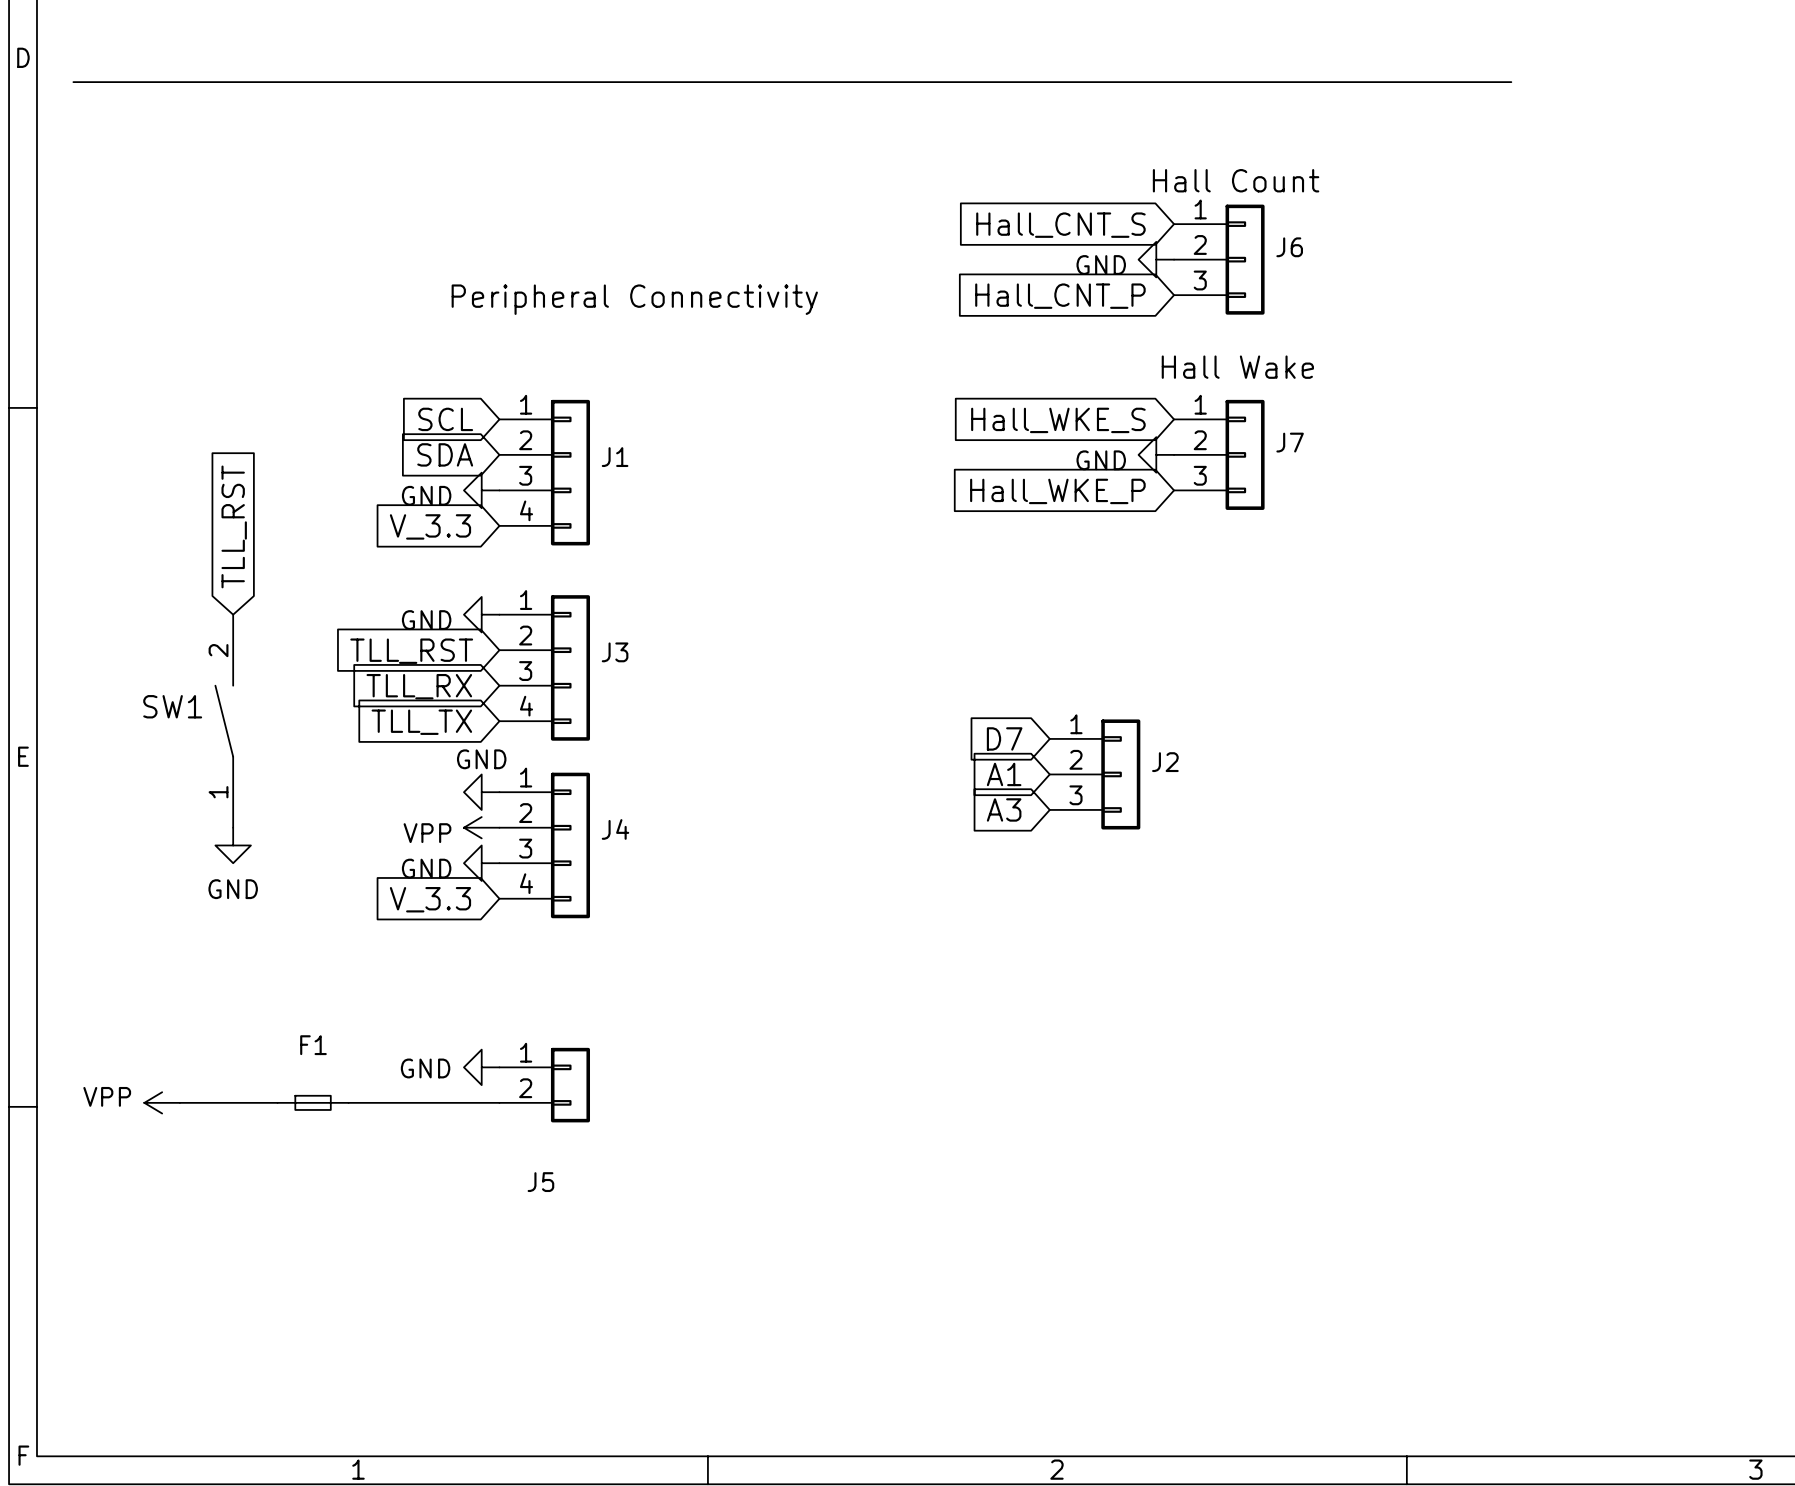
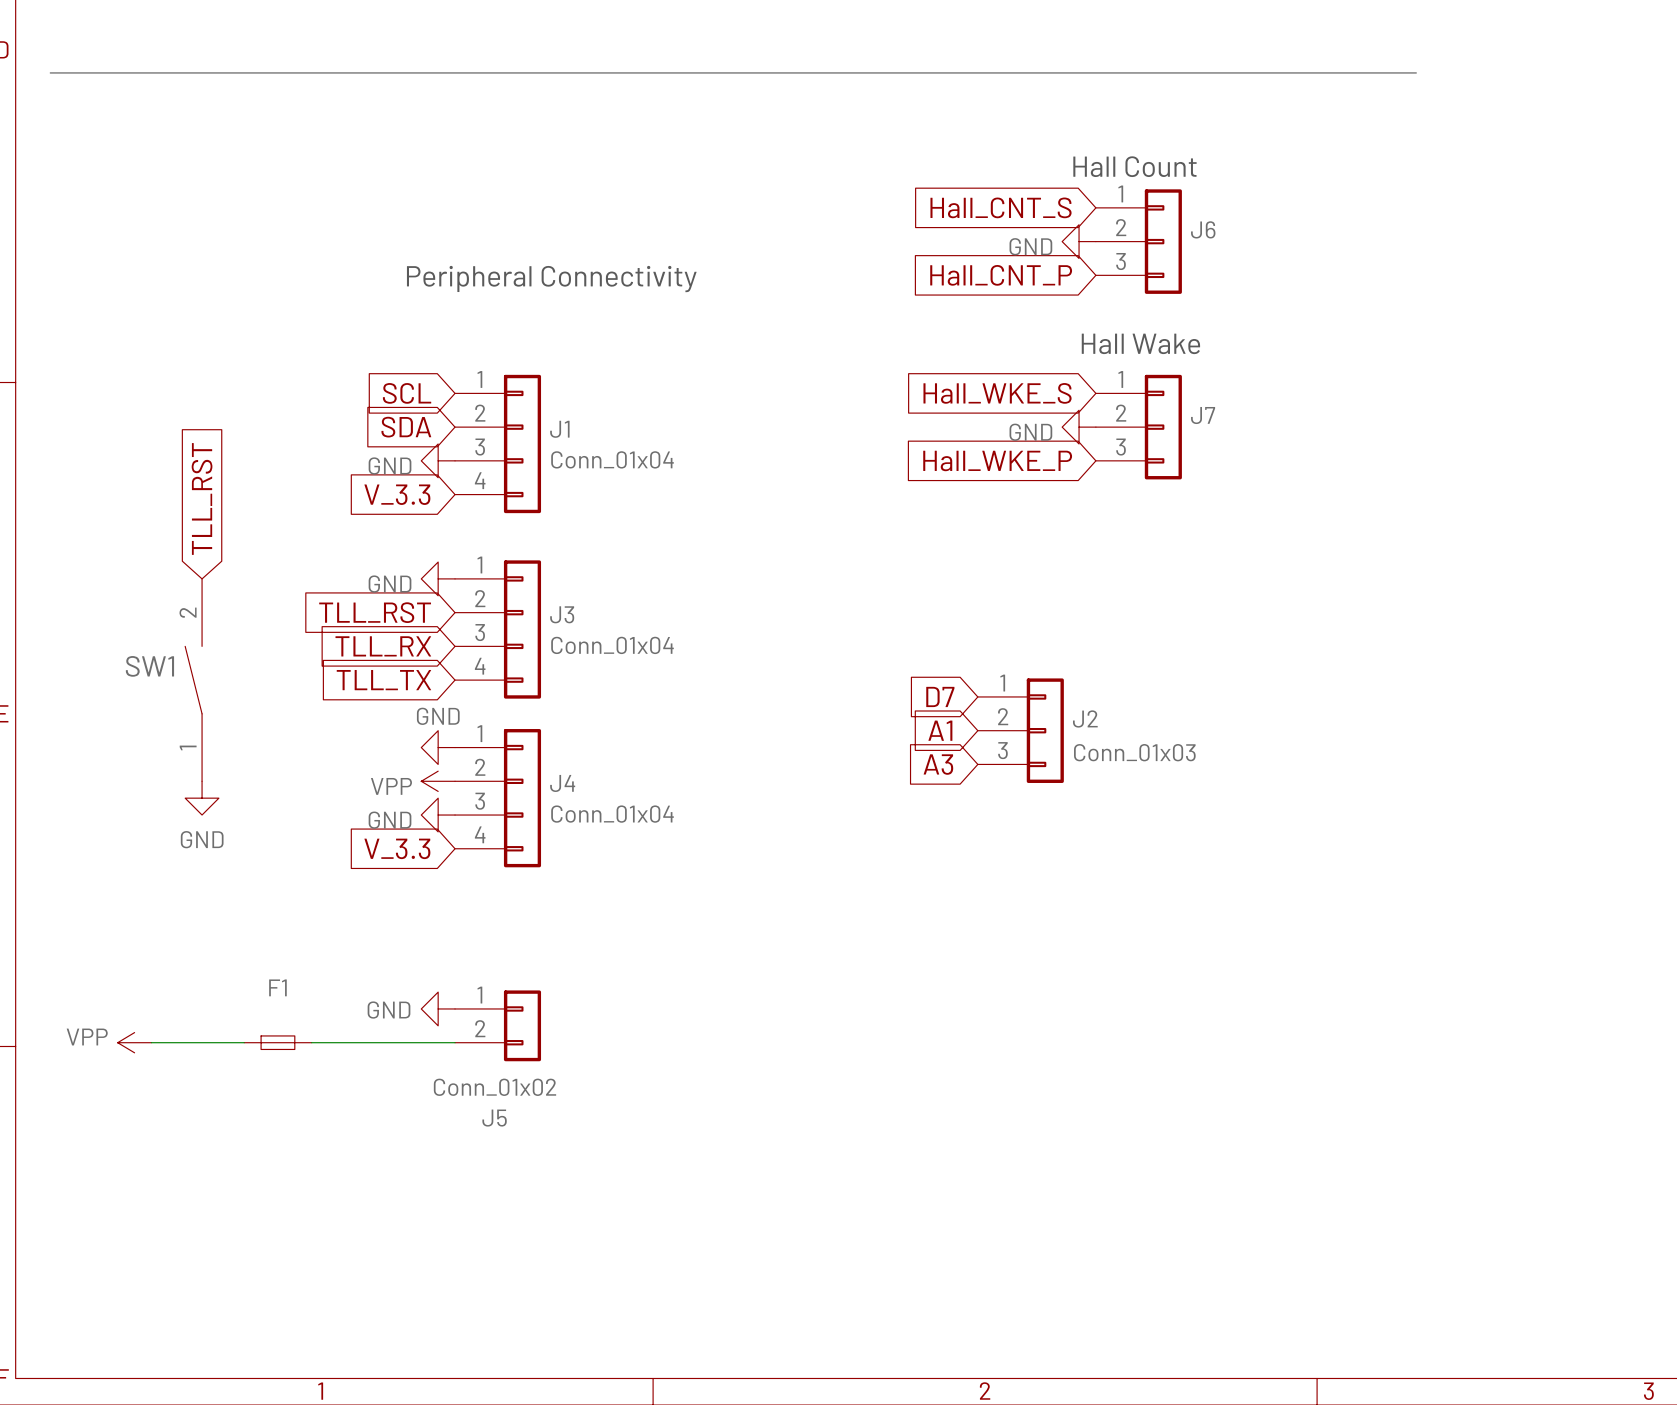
J1 value: none -> Conn_01x04 (612, 459)
J3 value: none -> Conn_01x04 (612, 645)
J2 value: none -> Conn_01x03 (1134, 752)
J4 value: none -> Conn_01x04 (612, 814)
J5 value: none -> Conn_01x02 (494, 1087)

